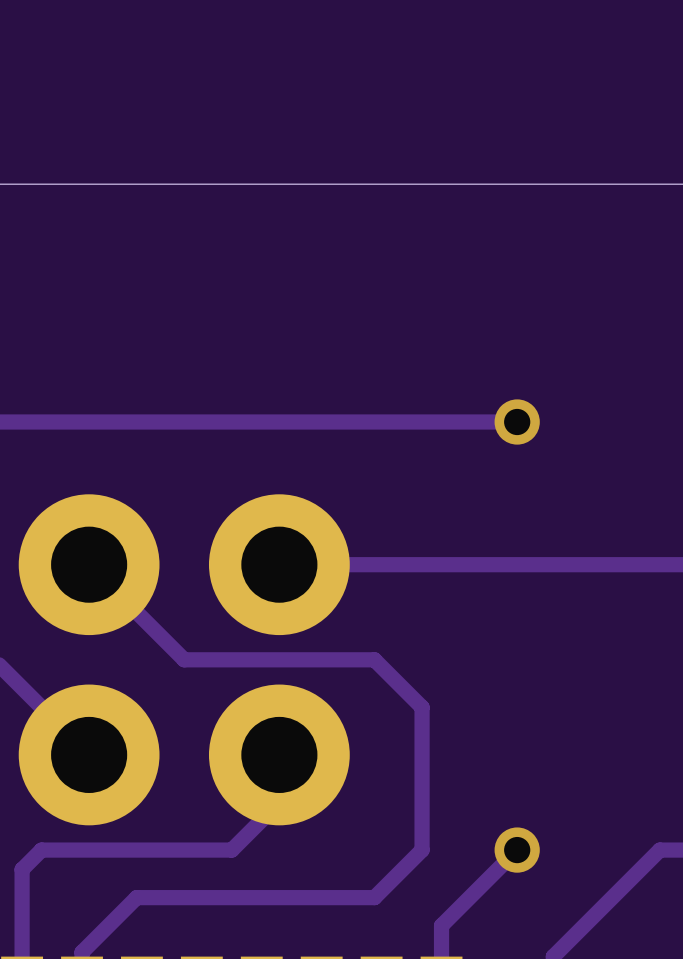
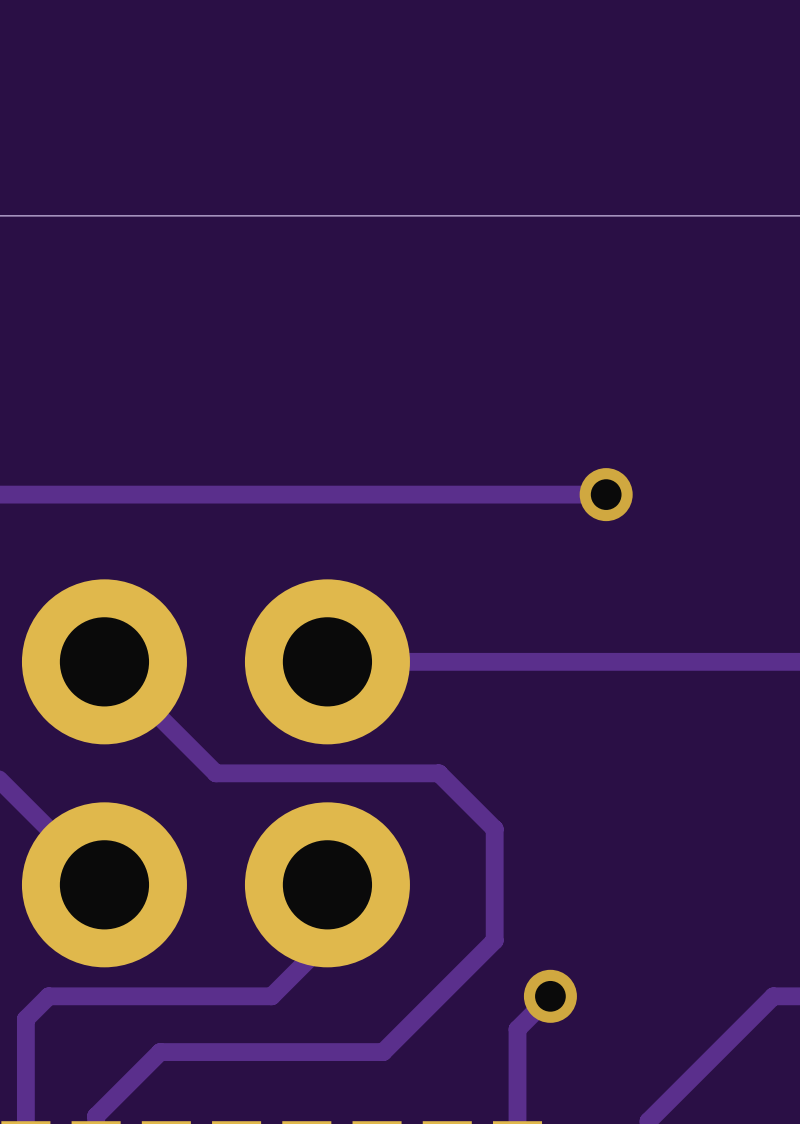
track: (422, 802) (422, 850) (374, 897) (326, 897) -> (494, 940) (383, 1052)
track: (517, 850) (441, 925) -> (550, 996) (517, 1029) (517, 1084)
via position: (517, 850) -> (550, 996)

